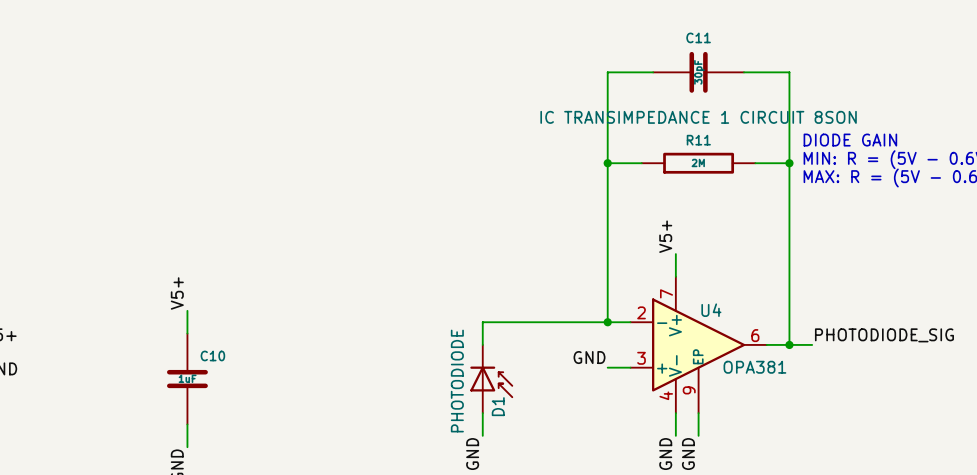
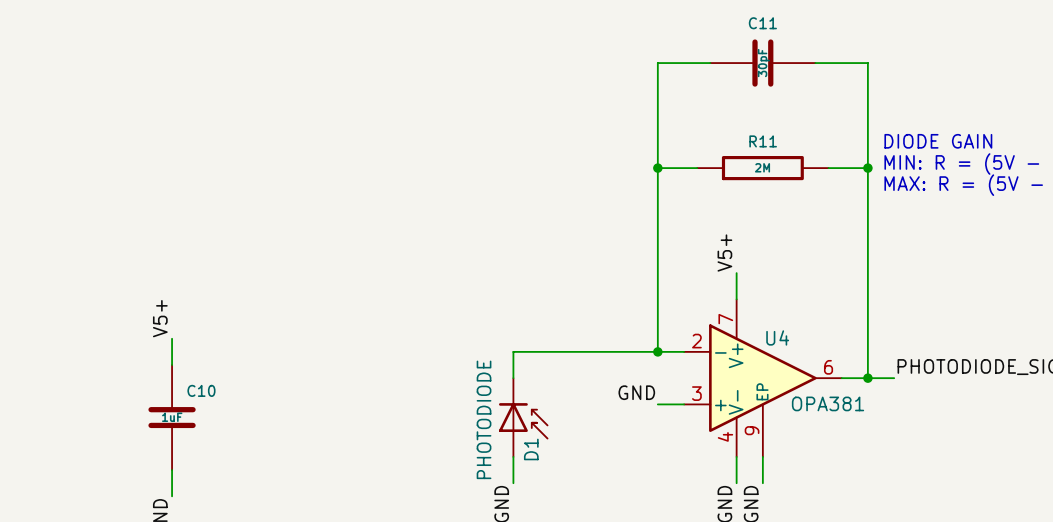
U4 text: IC TRANSIMPEDANCE 1 CIRCUIT 8SON (698, 117) -> none

